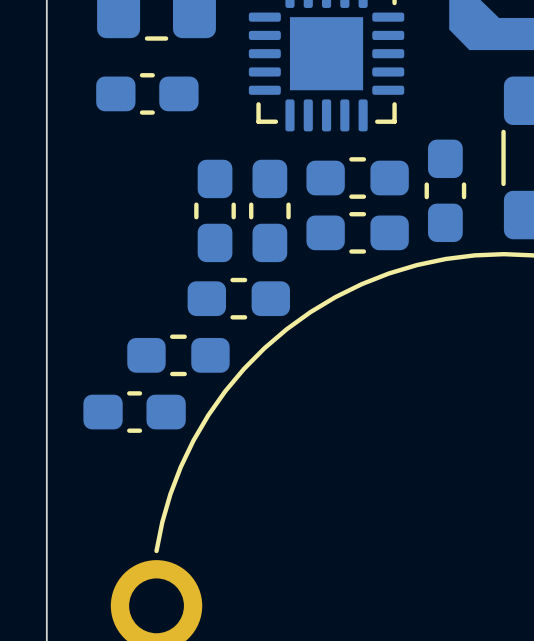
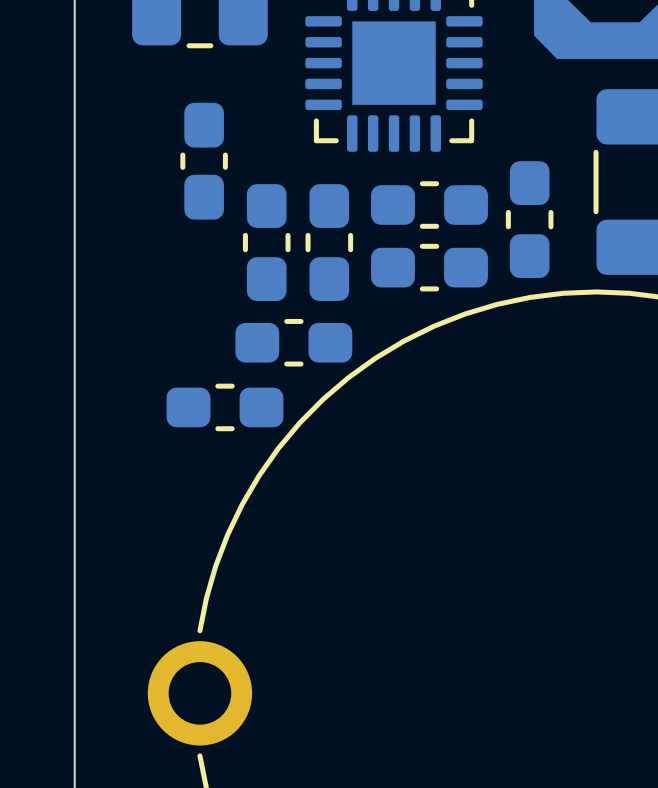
part rotation: 0° (147, 93) -> 90° clockwise (204, 161)
part: (134, 412) -> none

